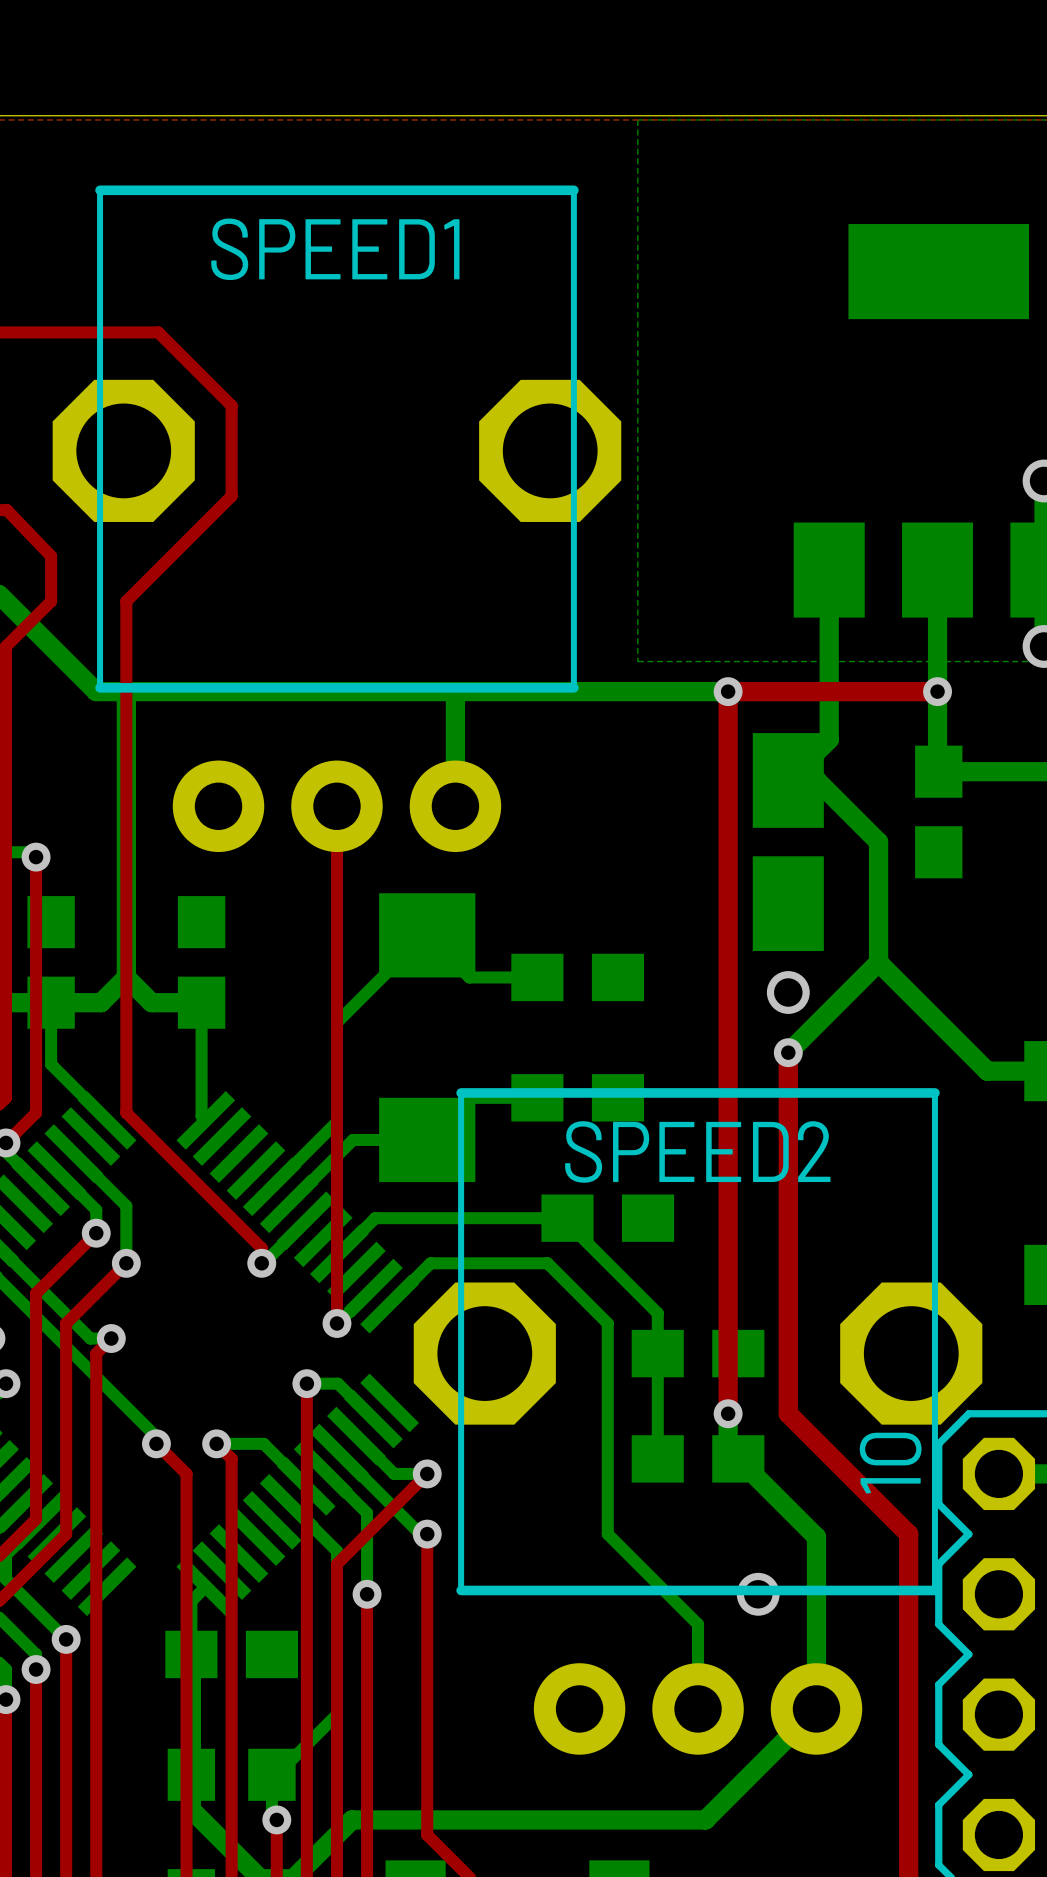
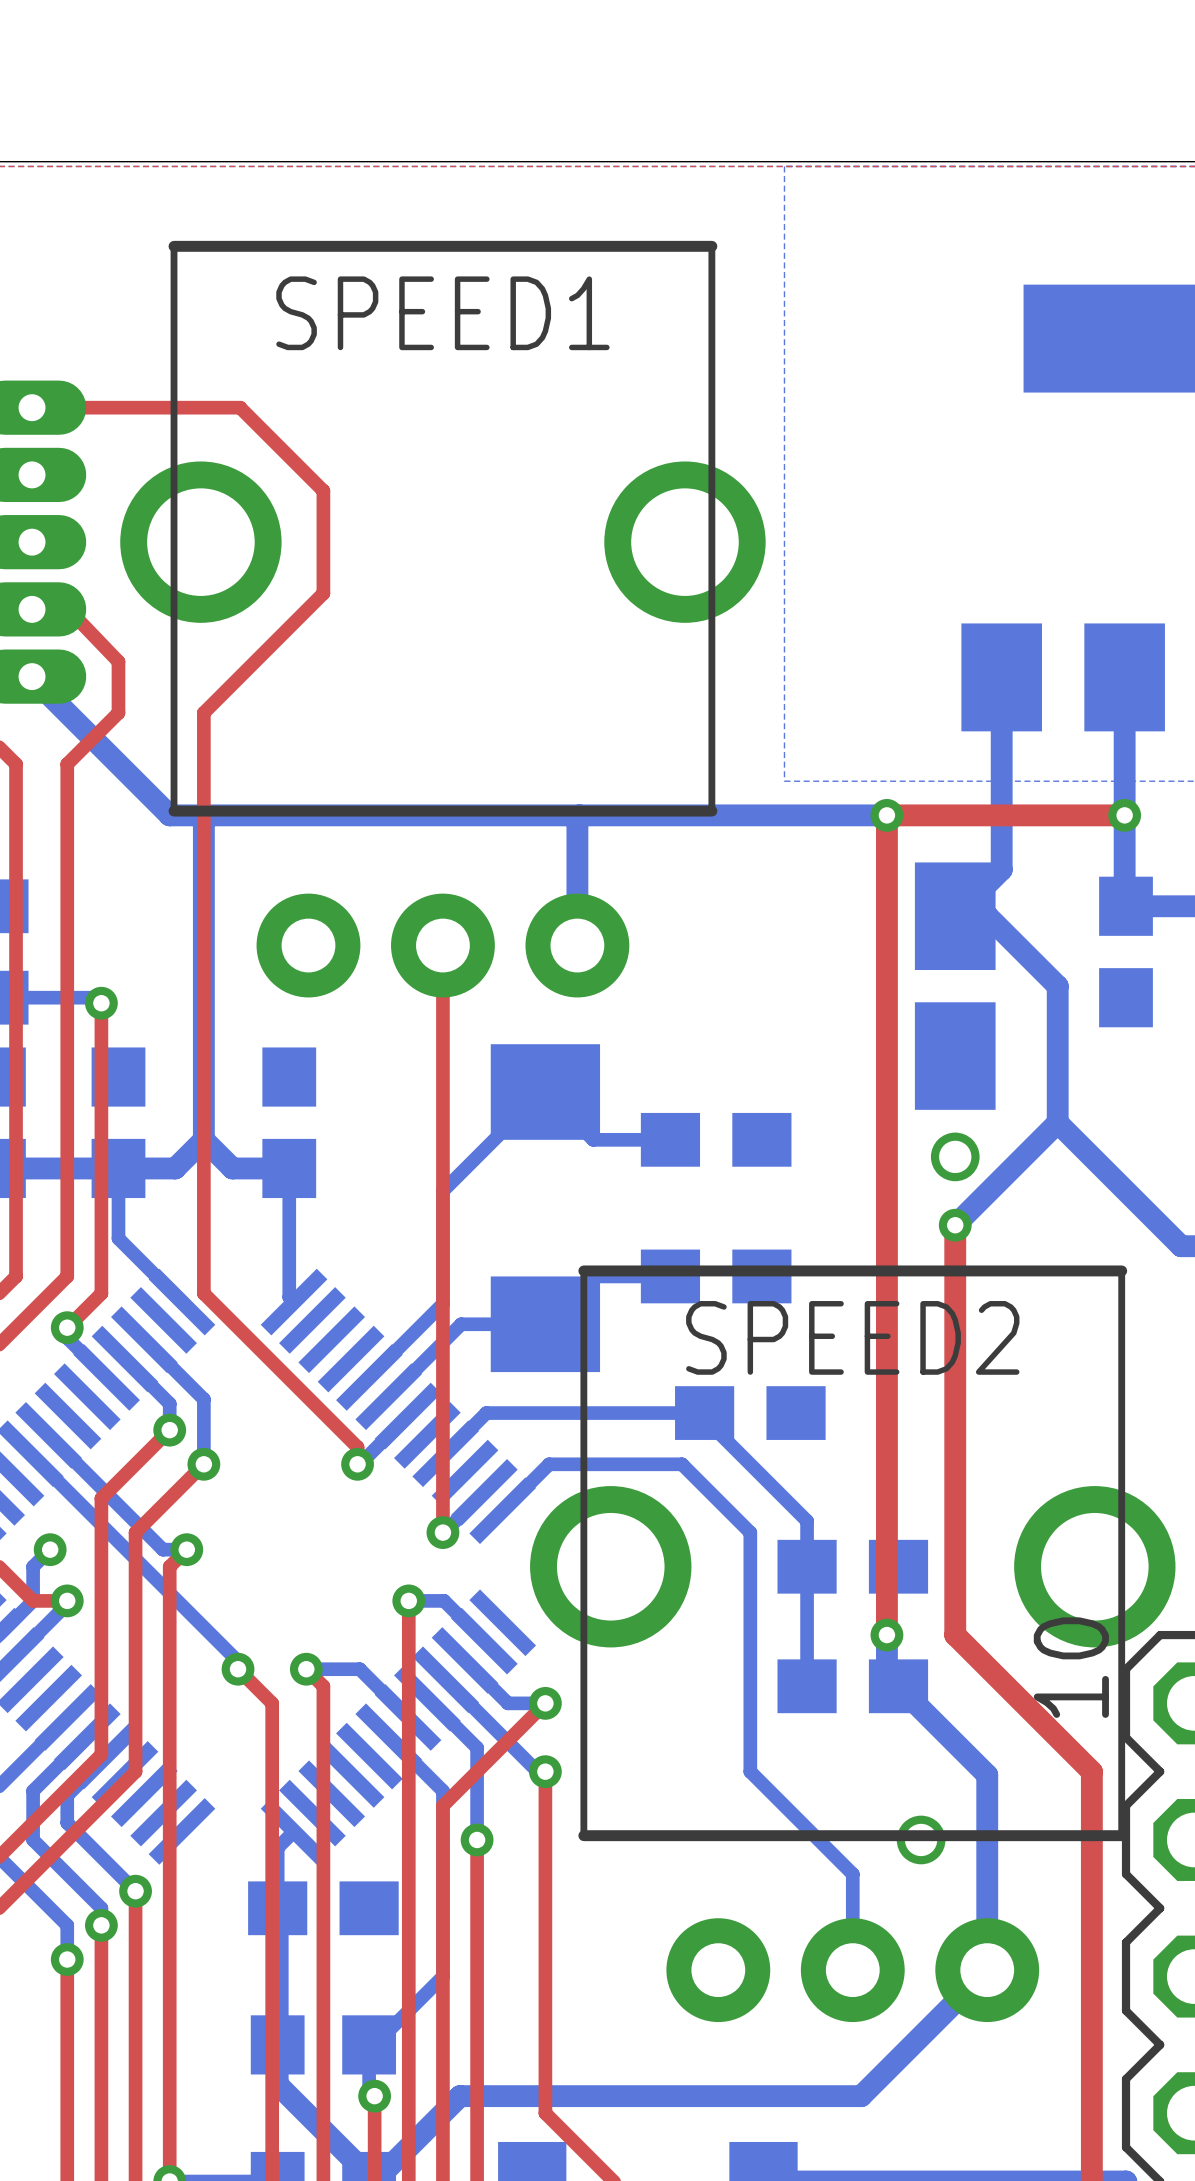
SPEED1 footprint: [52, 185, 622, 853] -> [120, 240, 766, 998]
SPEED2 footprint: [413, 1088, 983, 1755] -> [530, 1265, 1176, 2023]

